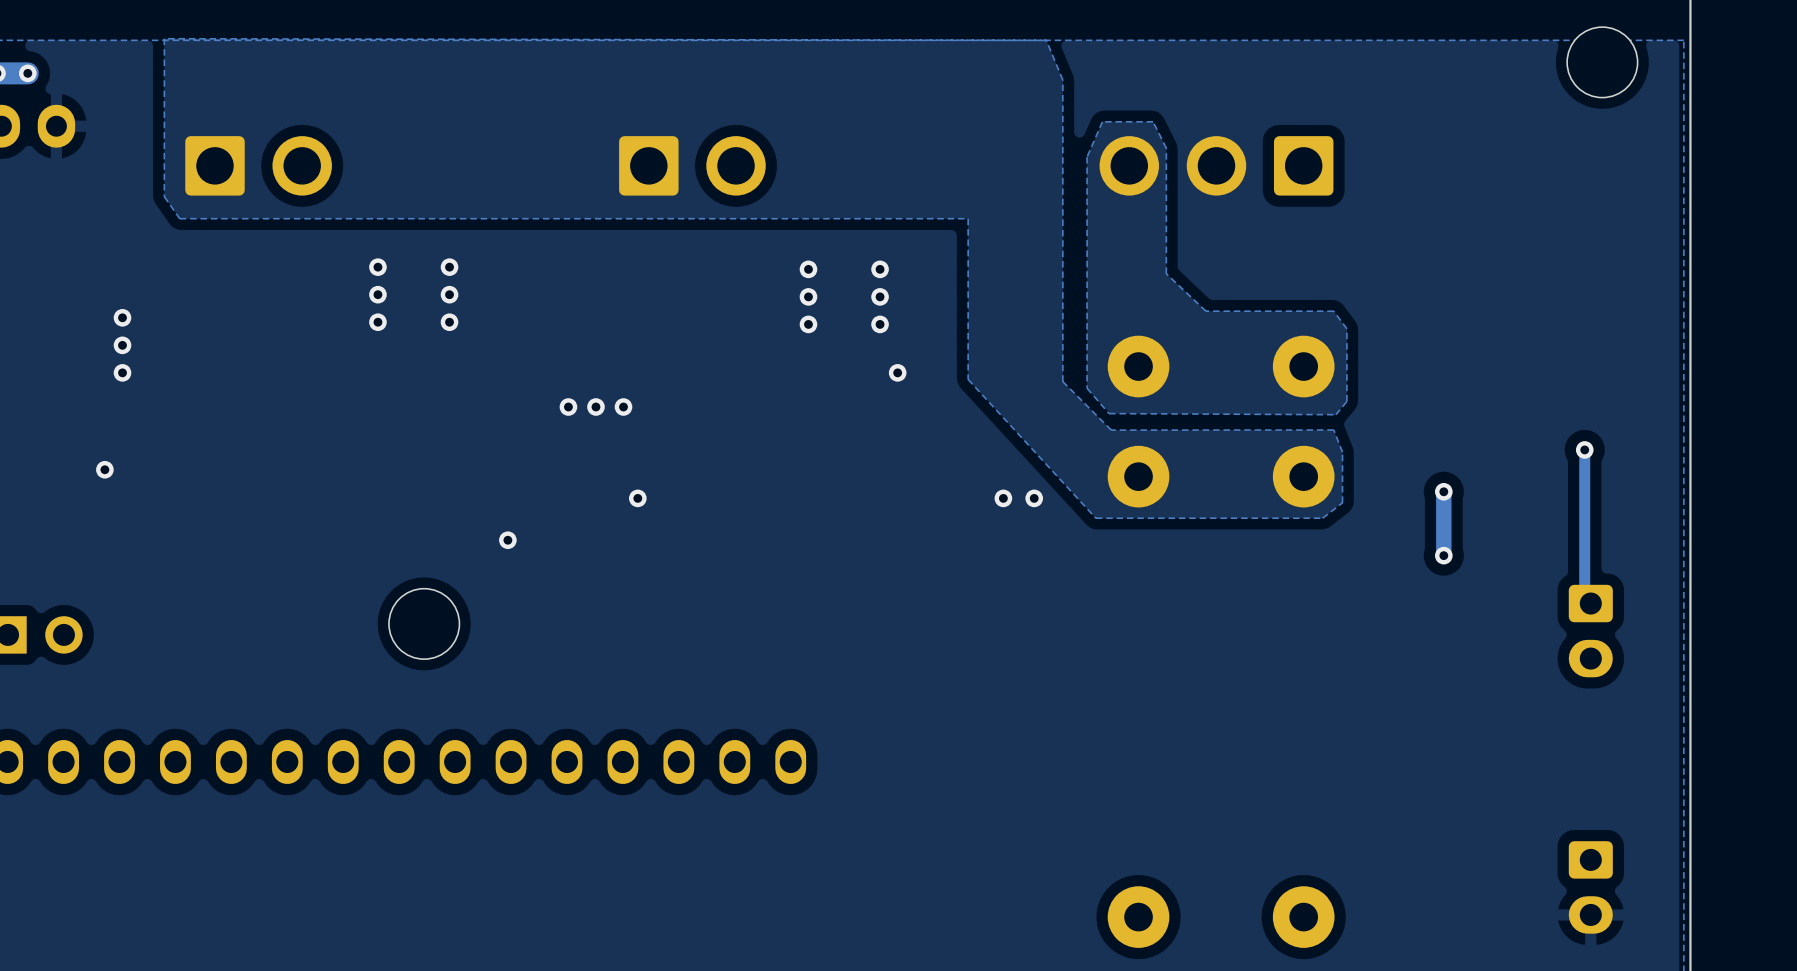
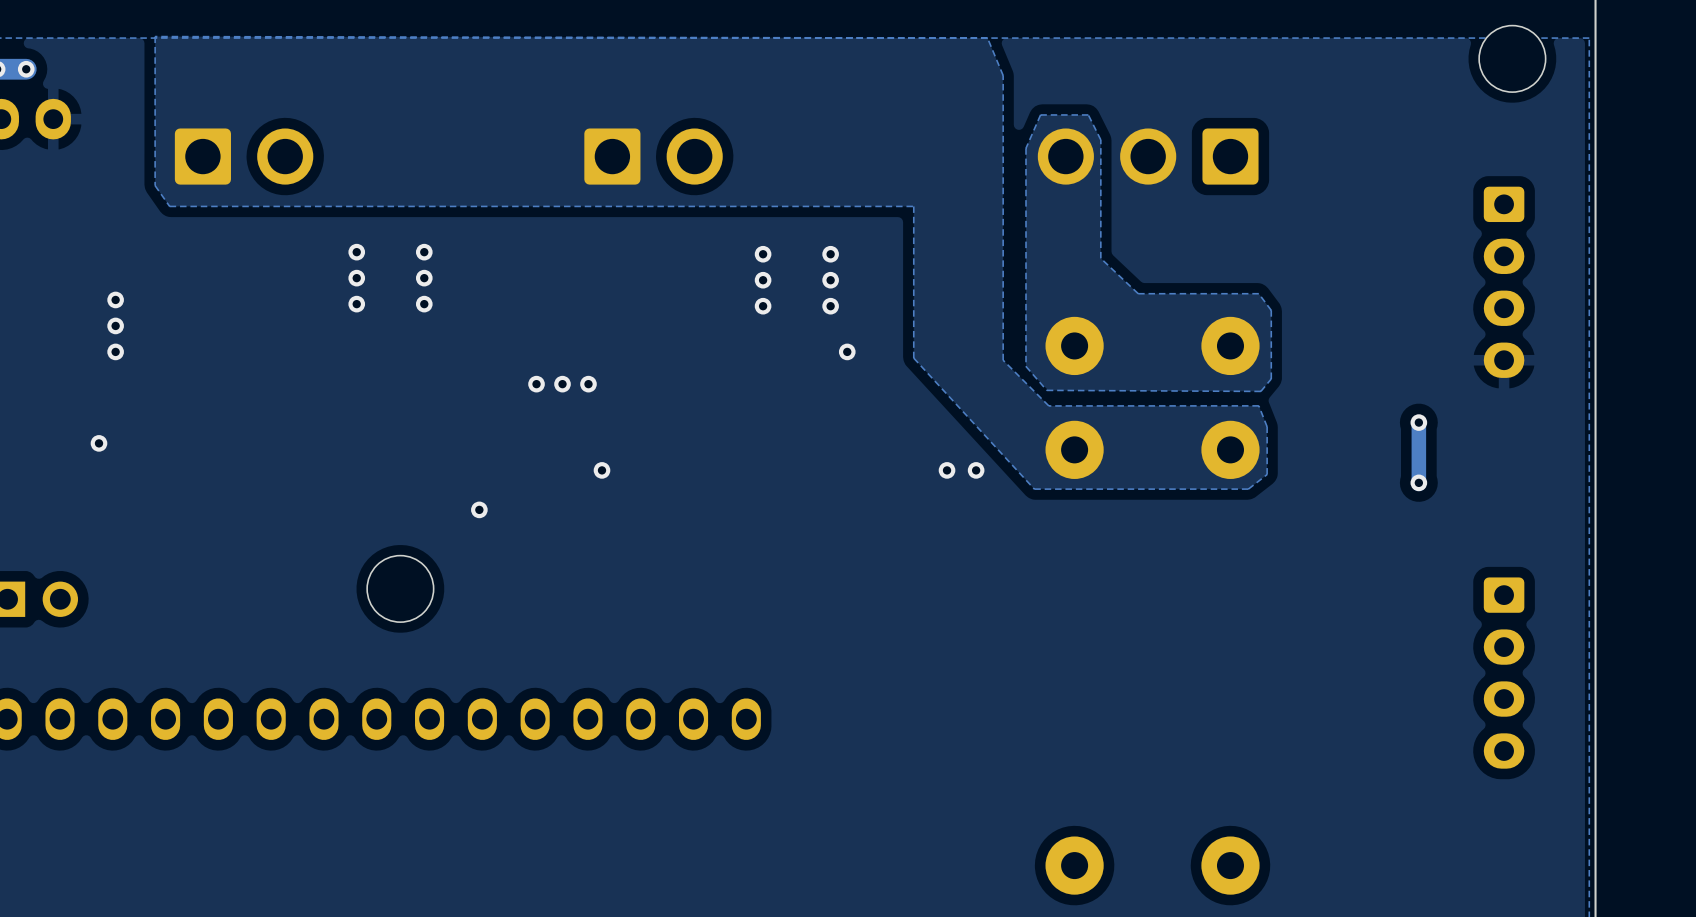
part: none -> (1504, 282)
via: none -> (1418, 422)
track: (1584, 449) (1584, 597) -> none
via: (1584, 449) -> none
track: (1443, 491) (1443, 555) -> (1418, 423) (1418, 483)
via: (1443, 491) -> none
via: none -> (1418, 482)
via: (1443, 555) -> none
part: (1590, 631) -> none
part: none -> (1504, 673)
part: (1590, 887) -> none

